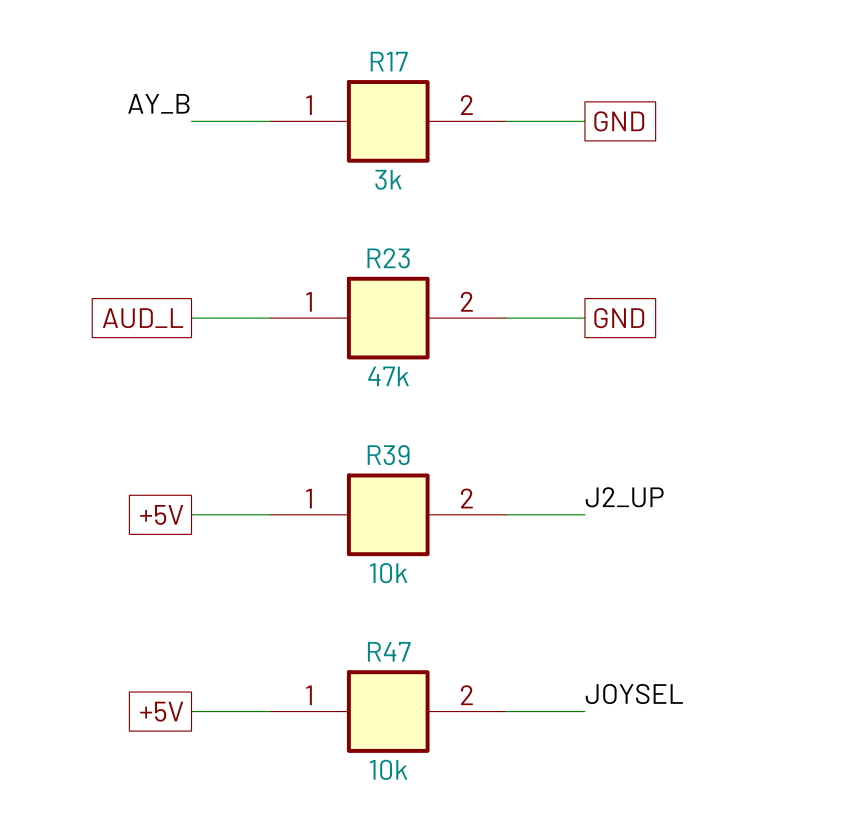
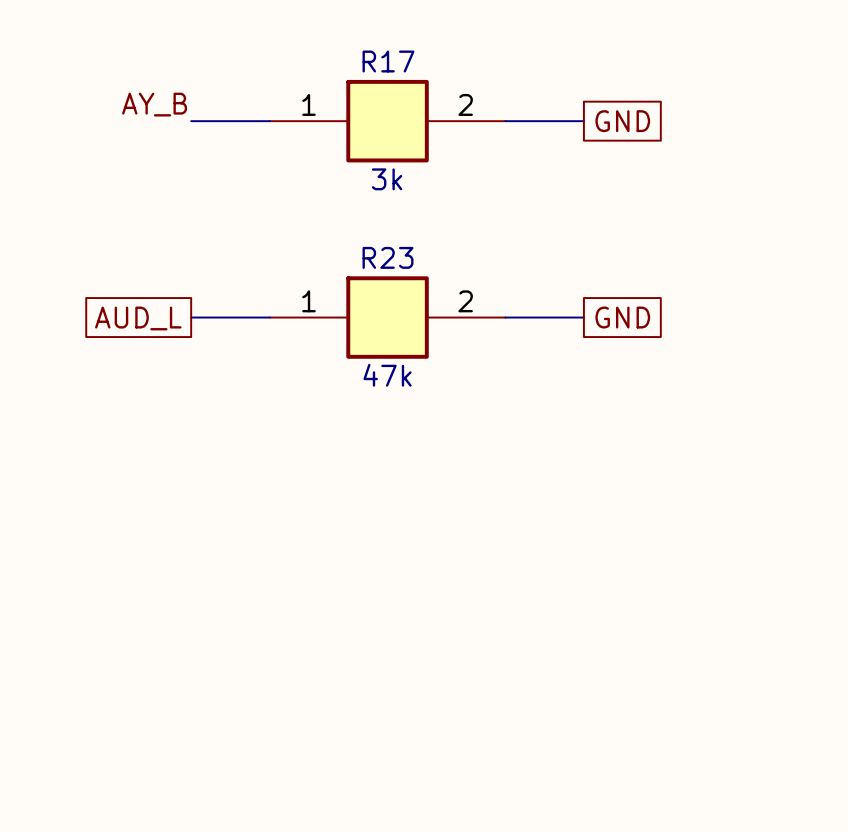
label: J2_UP (624, 497) -> none
global label: +5V (161, 514) -> none
wire: (191, 514) (270, 514) -> none
R39: 10k (388, 514) -> none
wire: (506, 514) (584, 514) -> none
label: JOYSEL (634, 694) -> none
global label: +5V (161, 711) -> none
wire: (191, 711) (270, 711) -> none
R47: 10k (388, 711) -> none
wire: (506, 711) (584, 711) -> none

